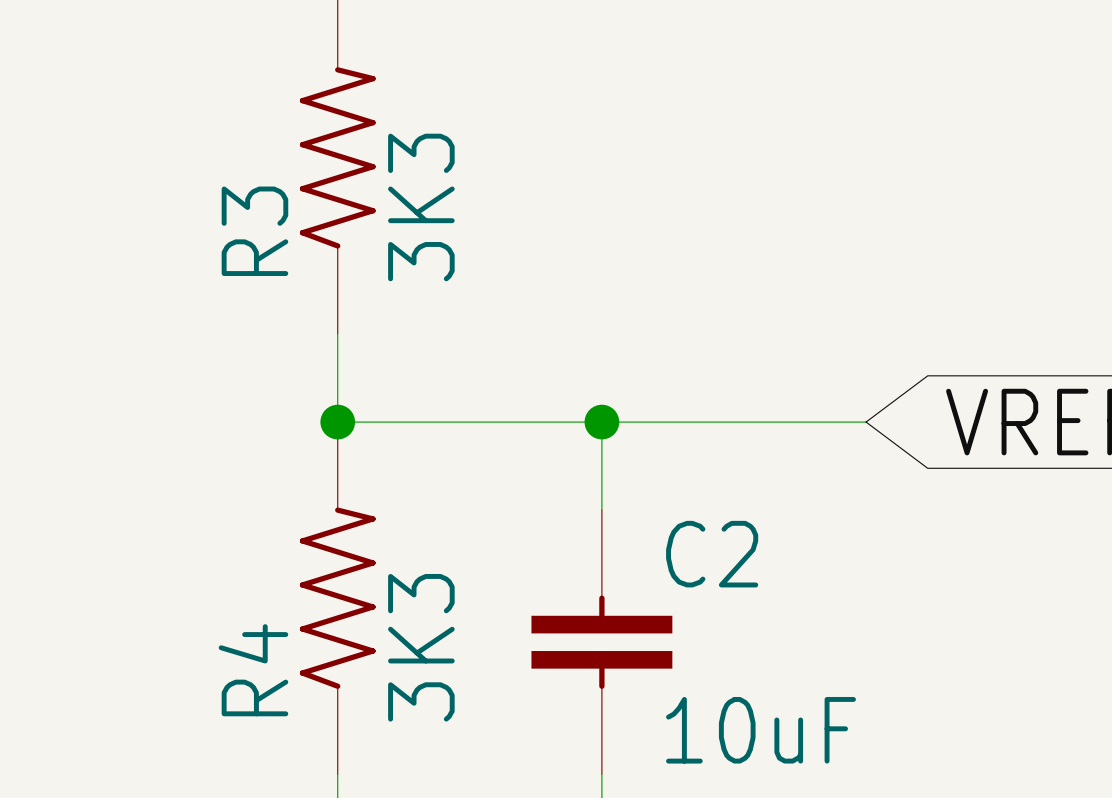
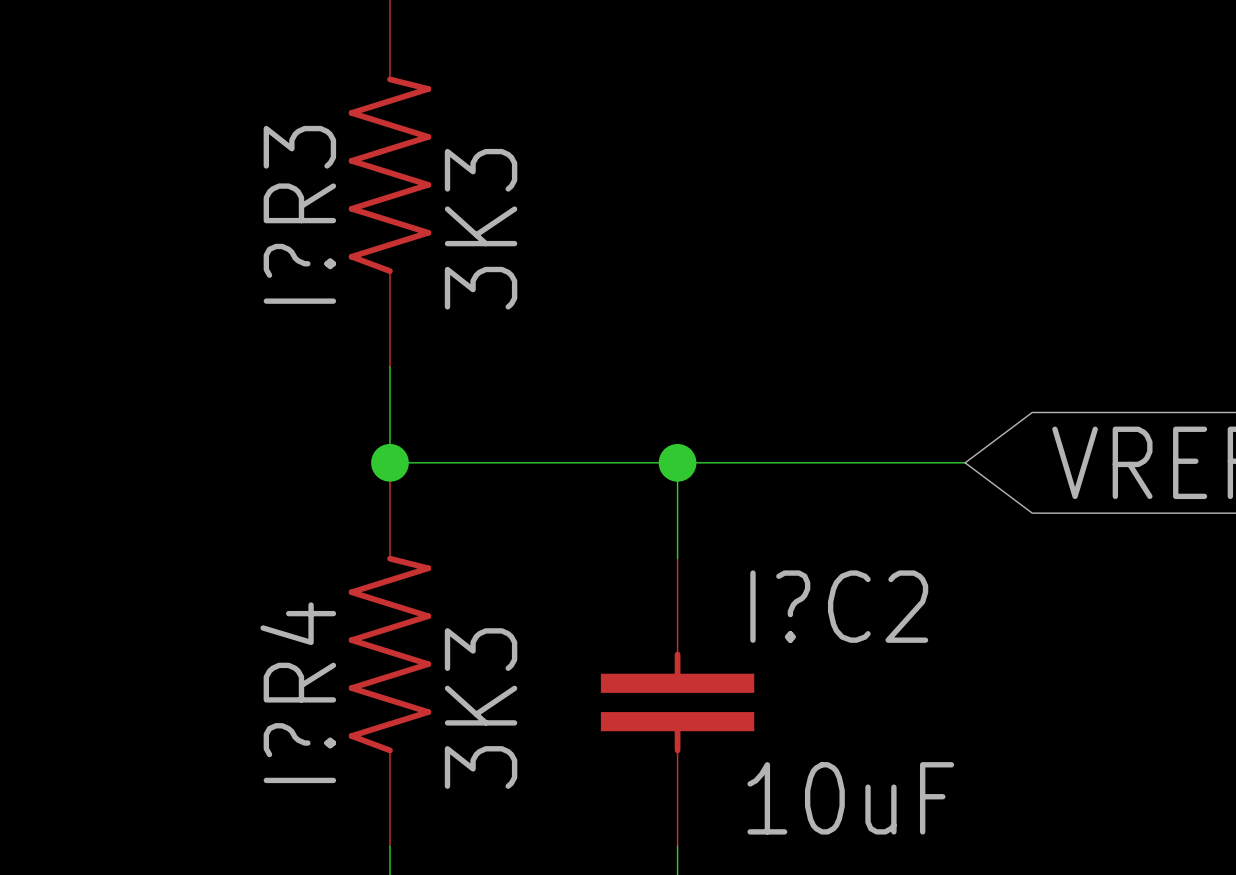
R3 name: R3 (254, 231) -> I?R3 (299, 214)
C2 name: C2 (712, 554) -> I?C2 (839, 606)
R4 name: R4 (253, 670) -> I?R4 (298, 692)

